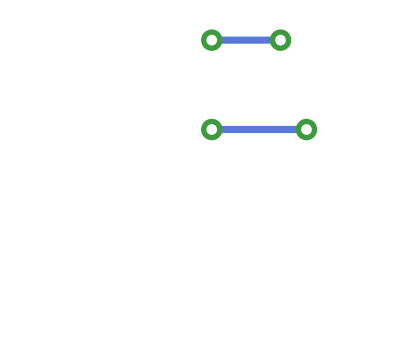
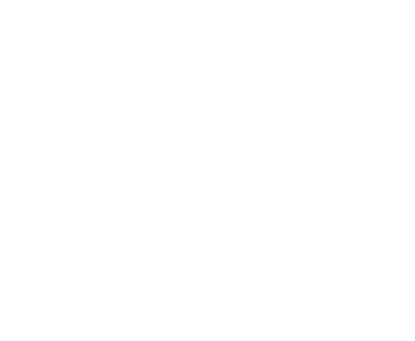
via: (211, 40) -> none
track: (280, 40) (211, 40) -> none
via: (280, 40) -> none
via: (211, 129) -> none
track: (306, 129) (211, 129) -> none
via: (306, 129) -> none

